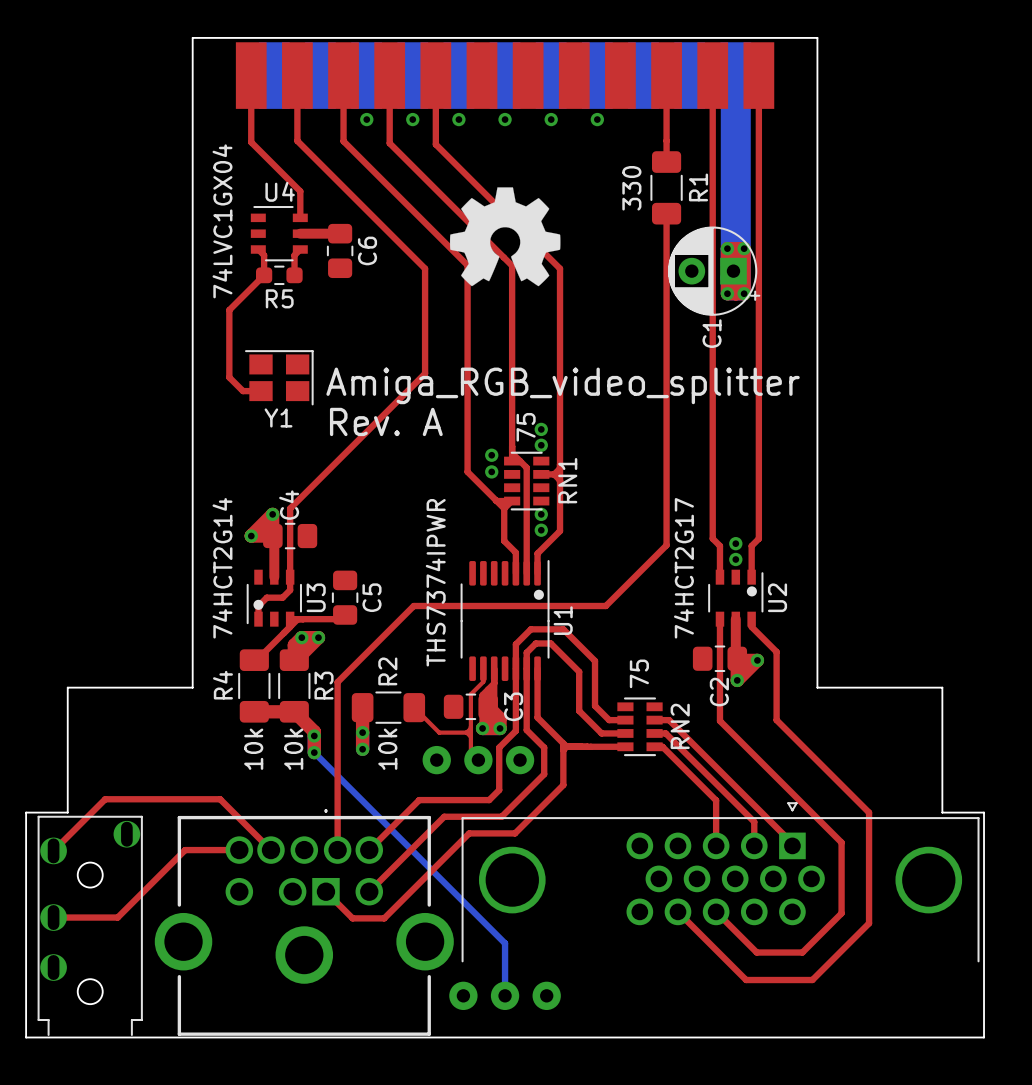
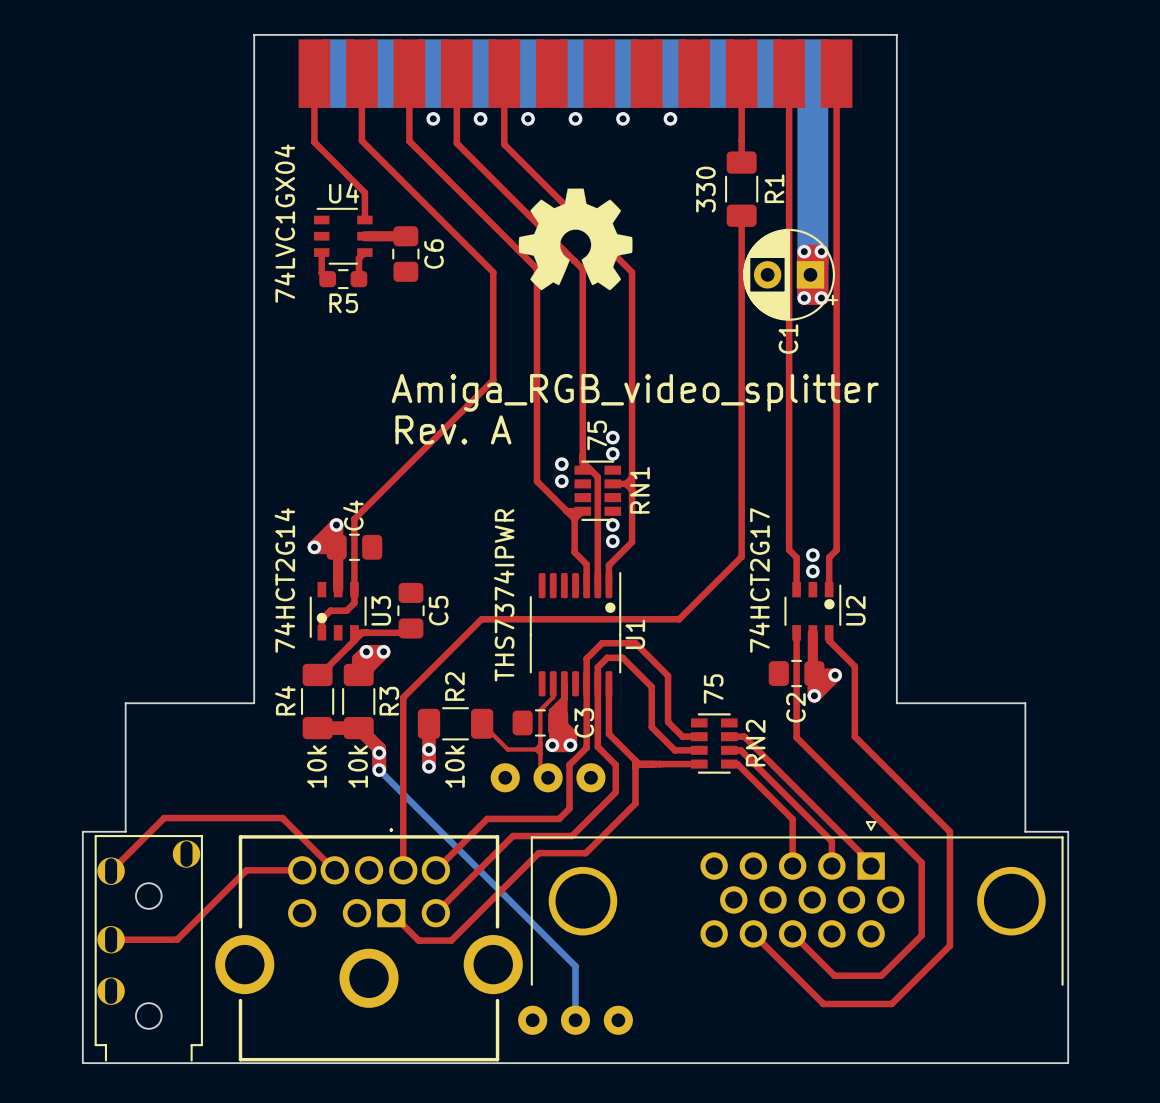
top track: (258, 249) (264, 255) (264, 275) (229, 310) (229, 377) (242, 391) (260, 391) -> (321, 252) (321, 273) (327, 279)
Y1: (279, 377) -> none

